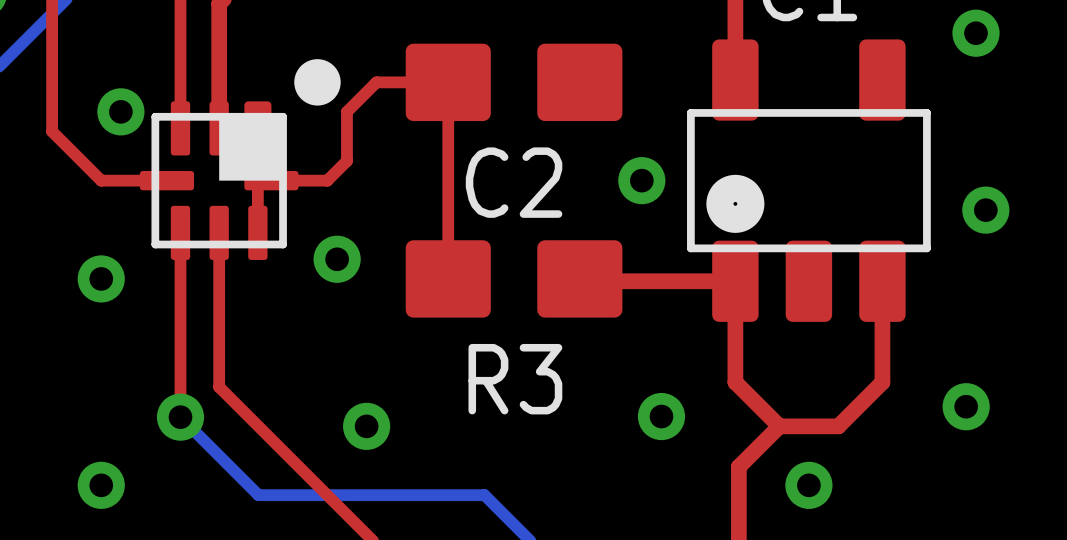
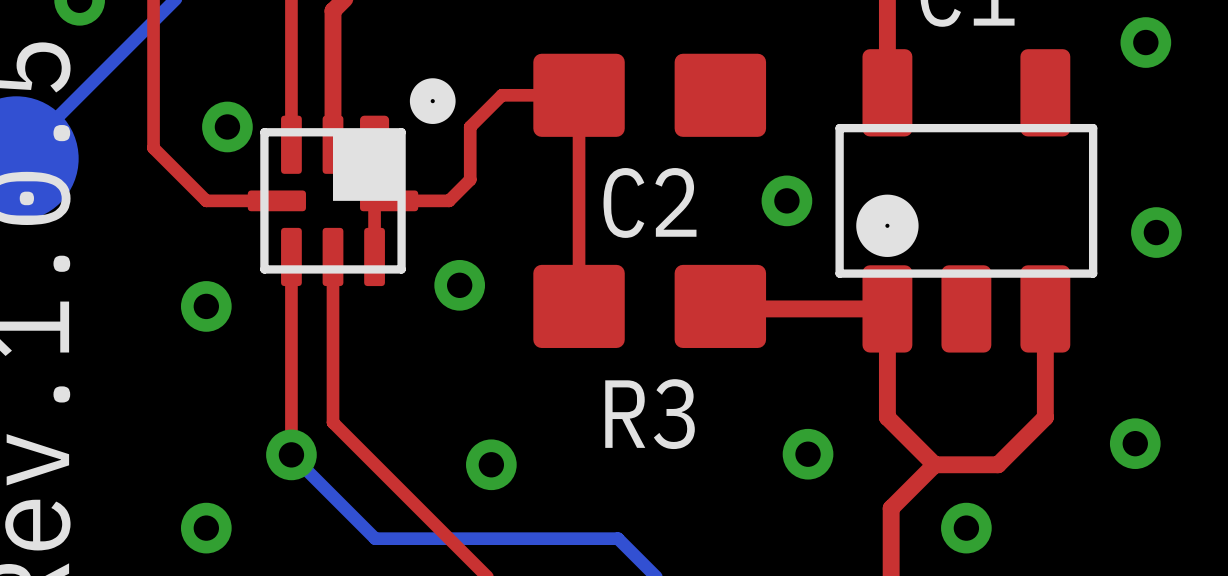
part footprint: [139, 59, 341, 260] -> [247, 78, 456, 287]

